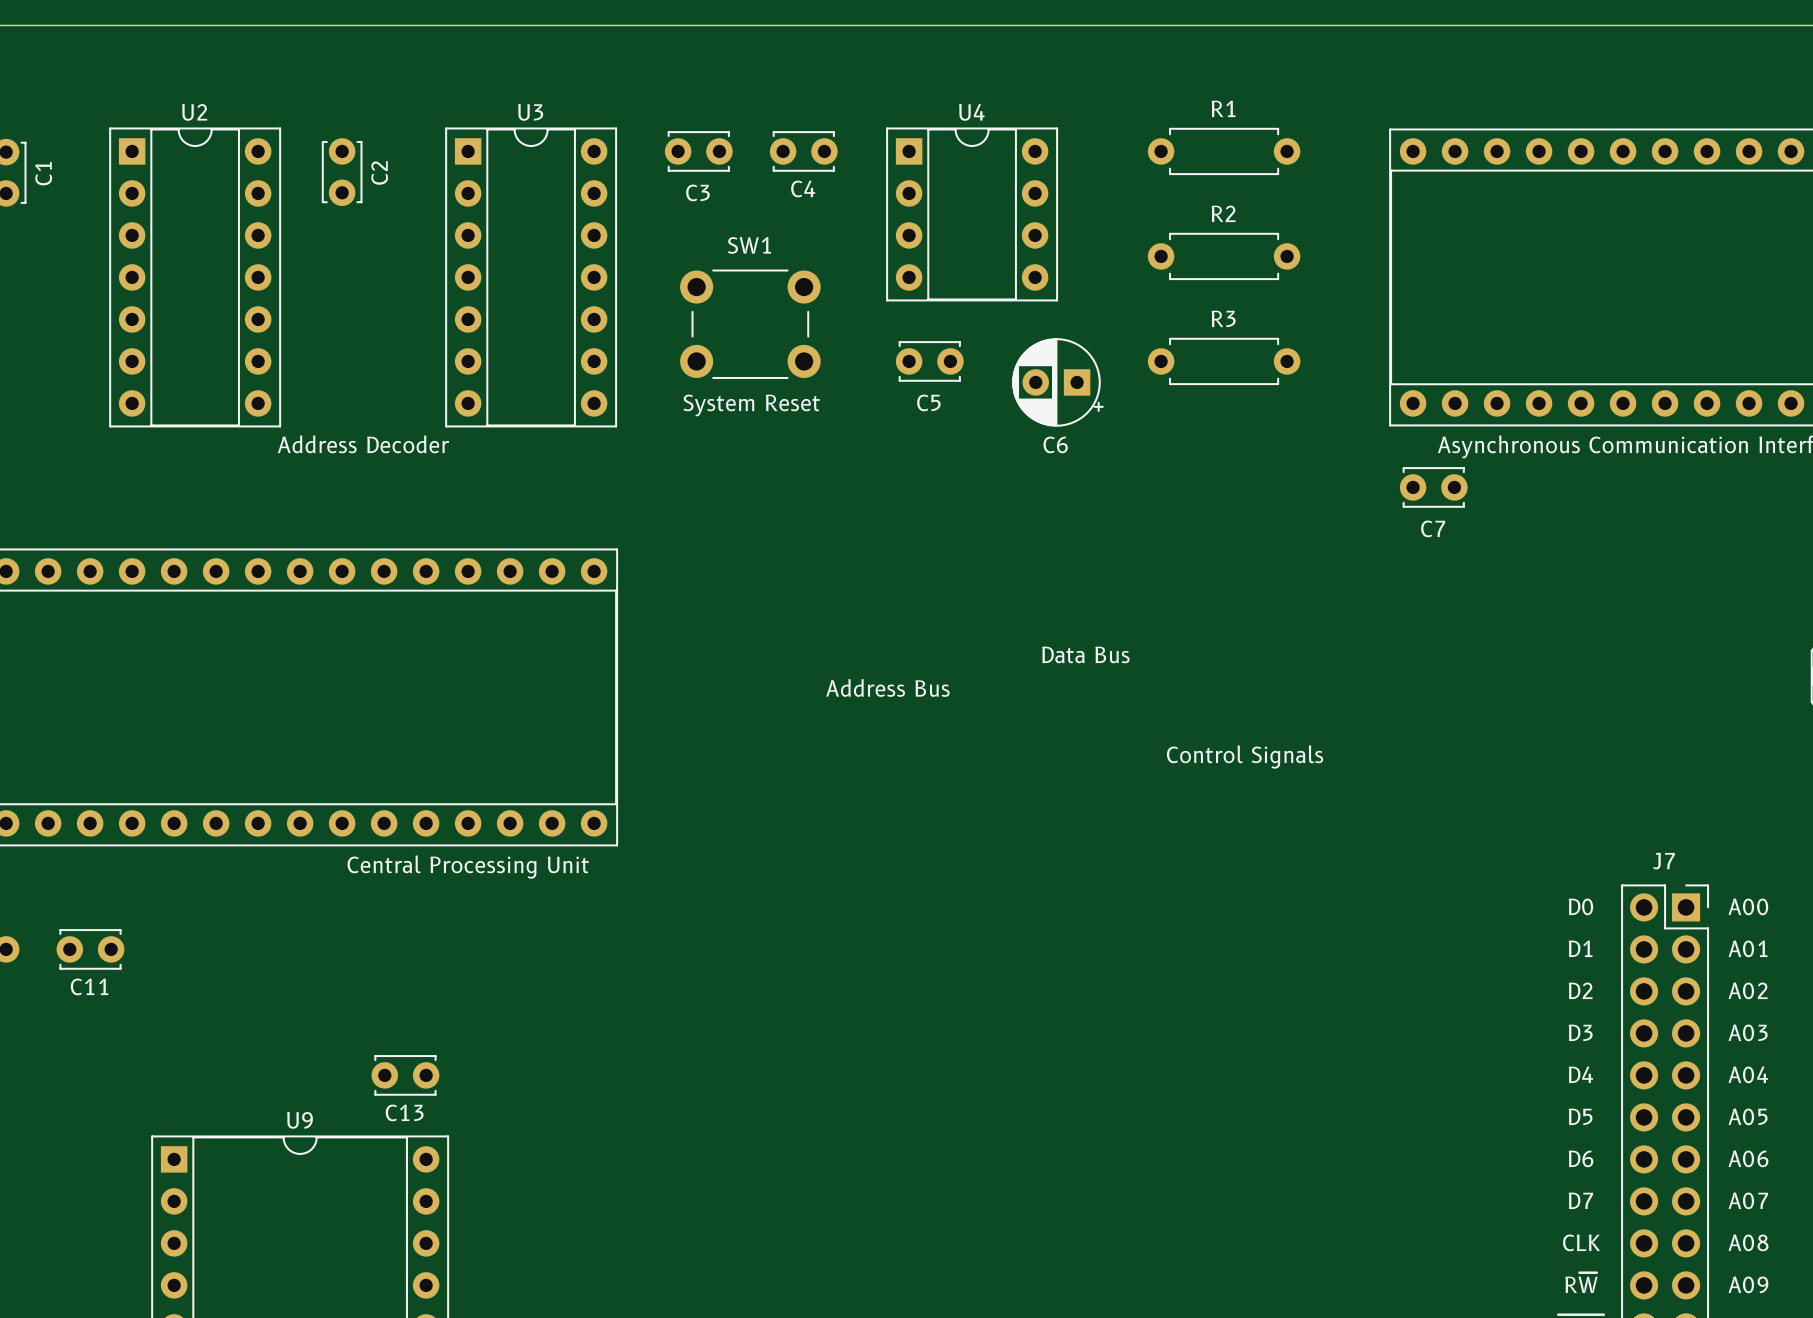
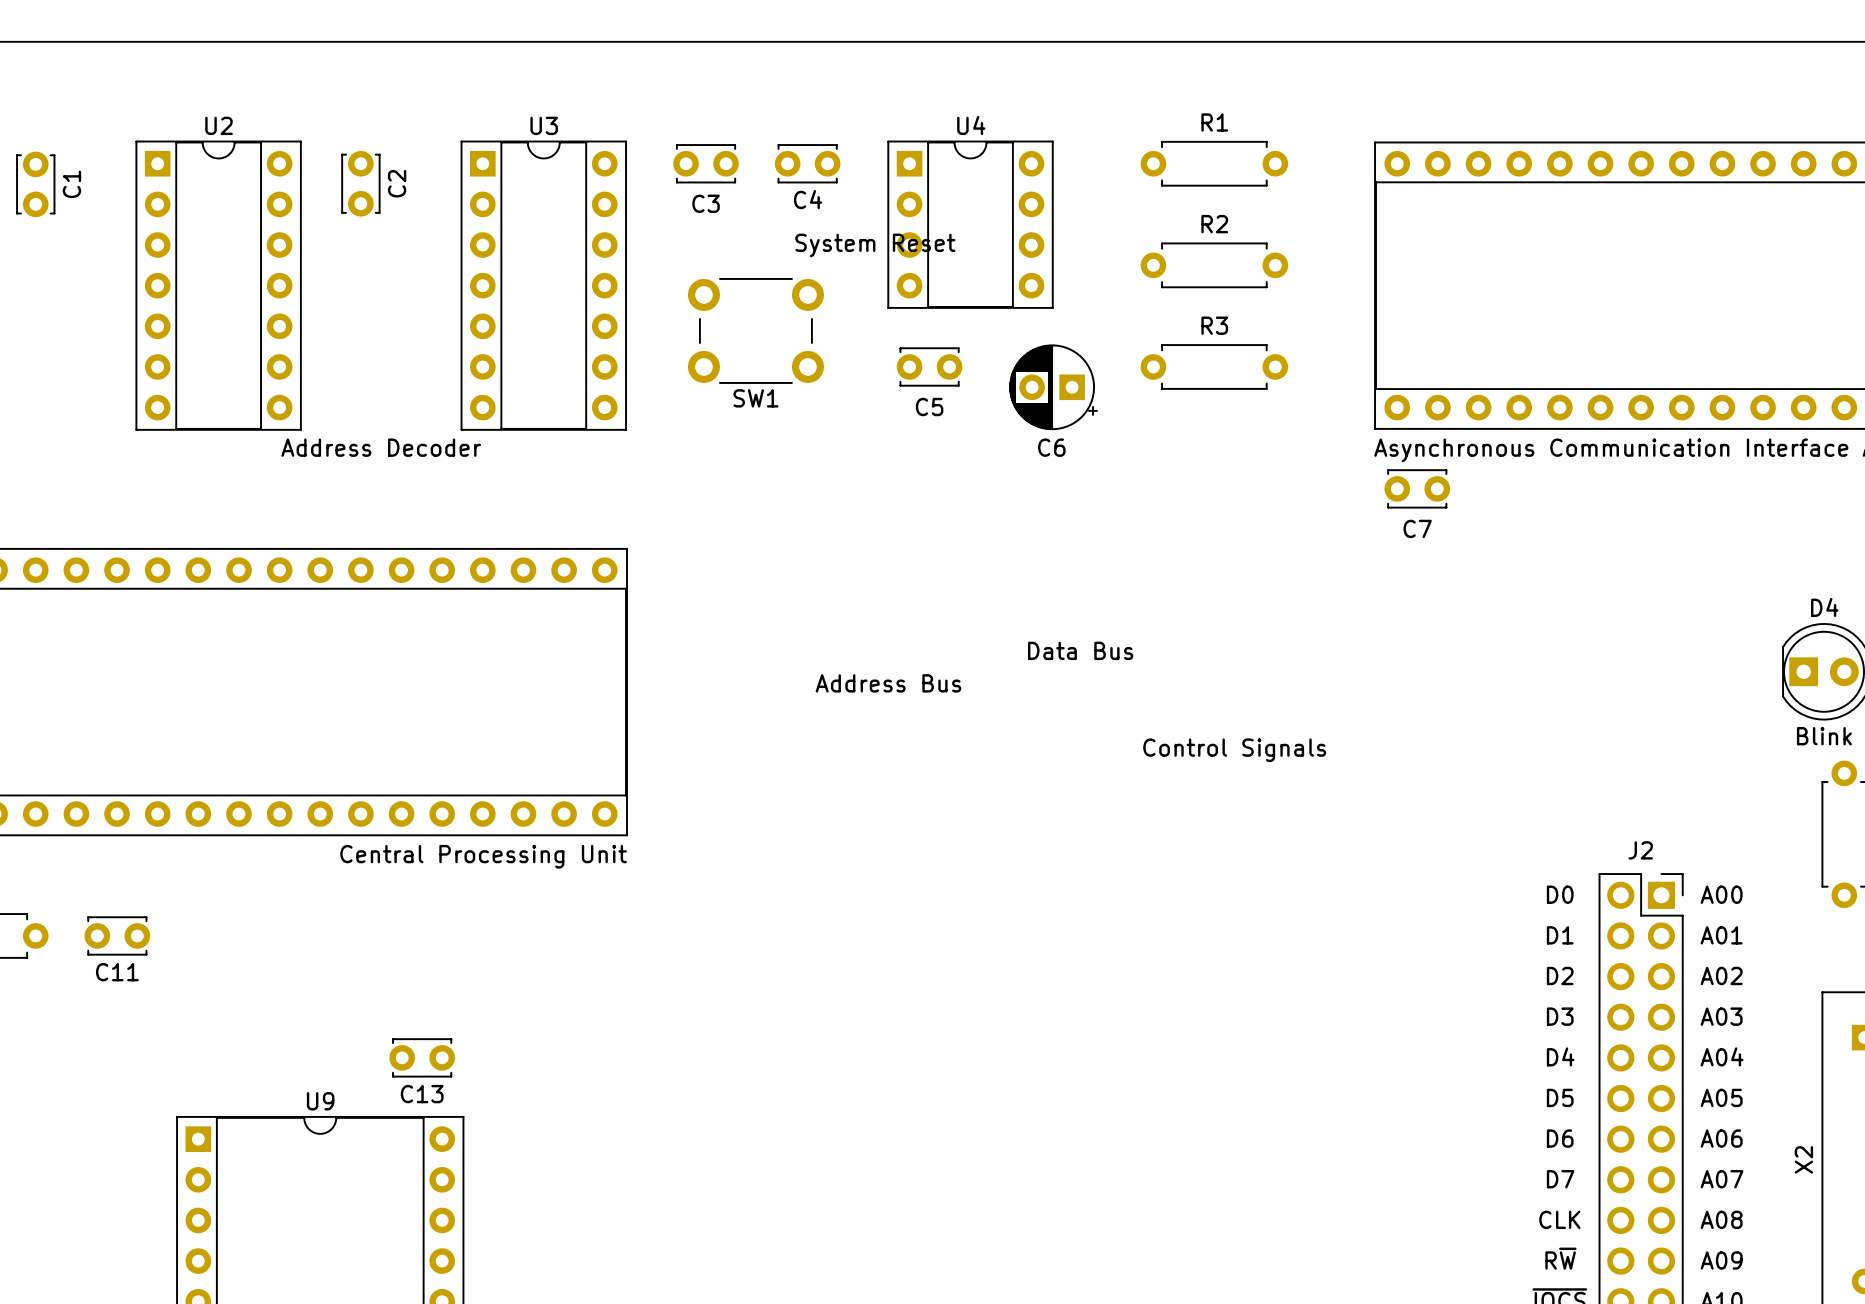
SW1 name position: SW1 (749, 245) -> SW1 (755, 398)
text position: System Reset (751, 405) -> System Reset (875, 245)
J7 name: J7 (1663, 861) -> J2 (1640, 850)

